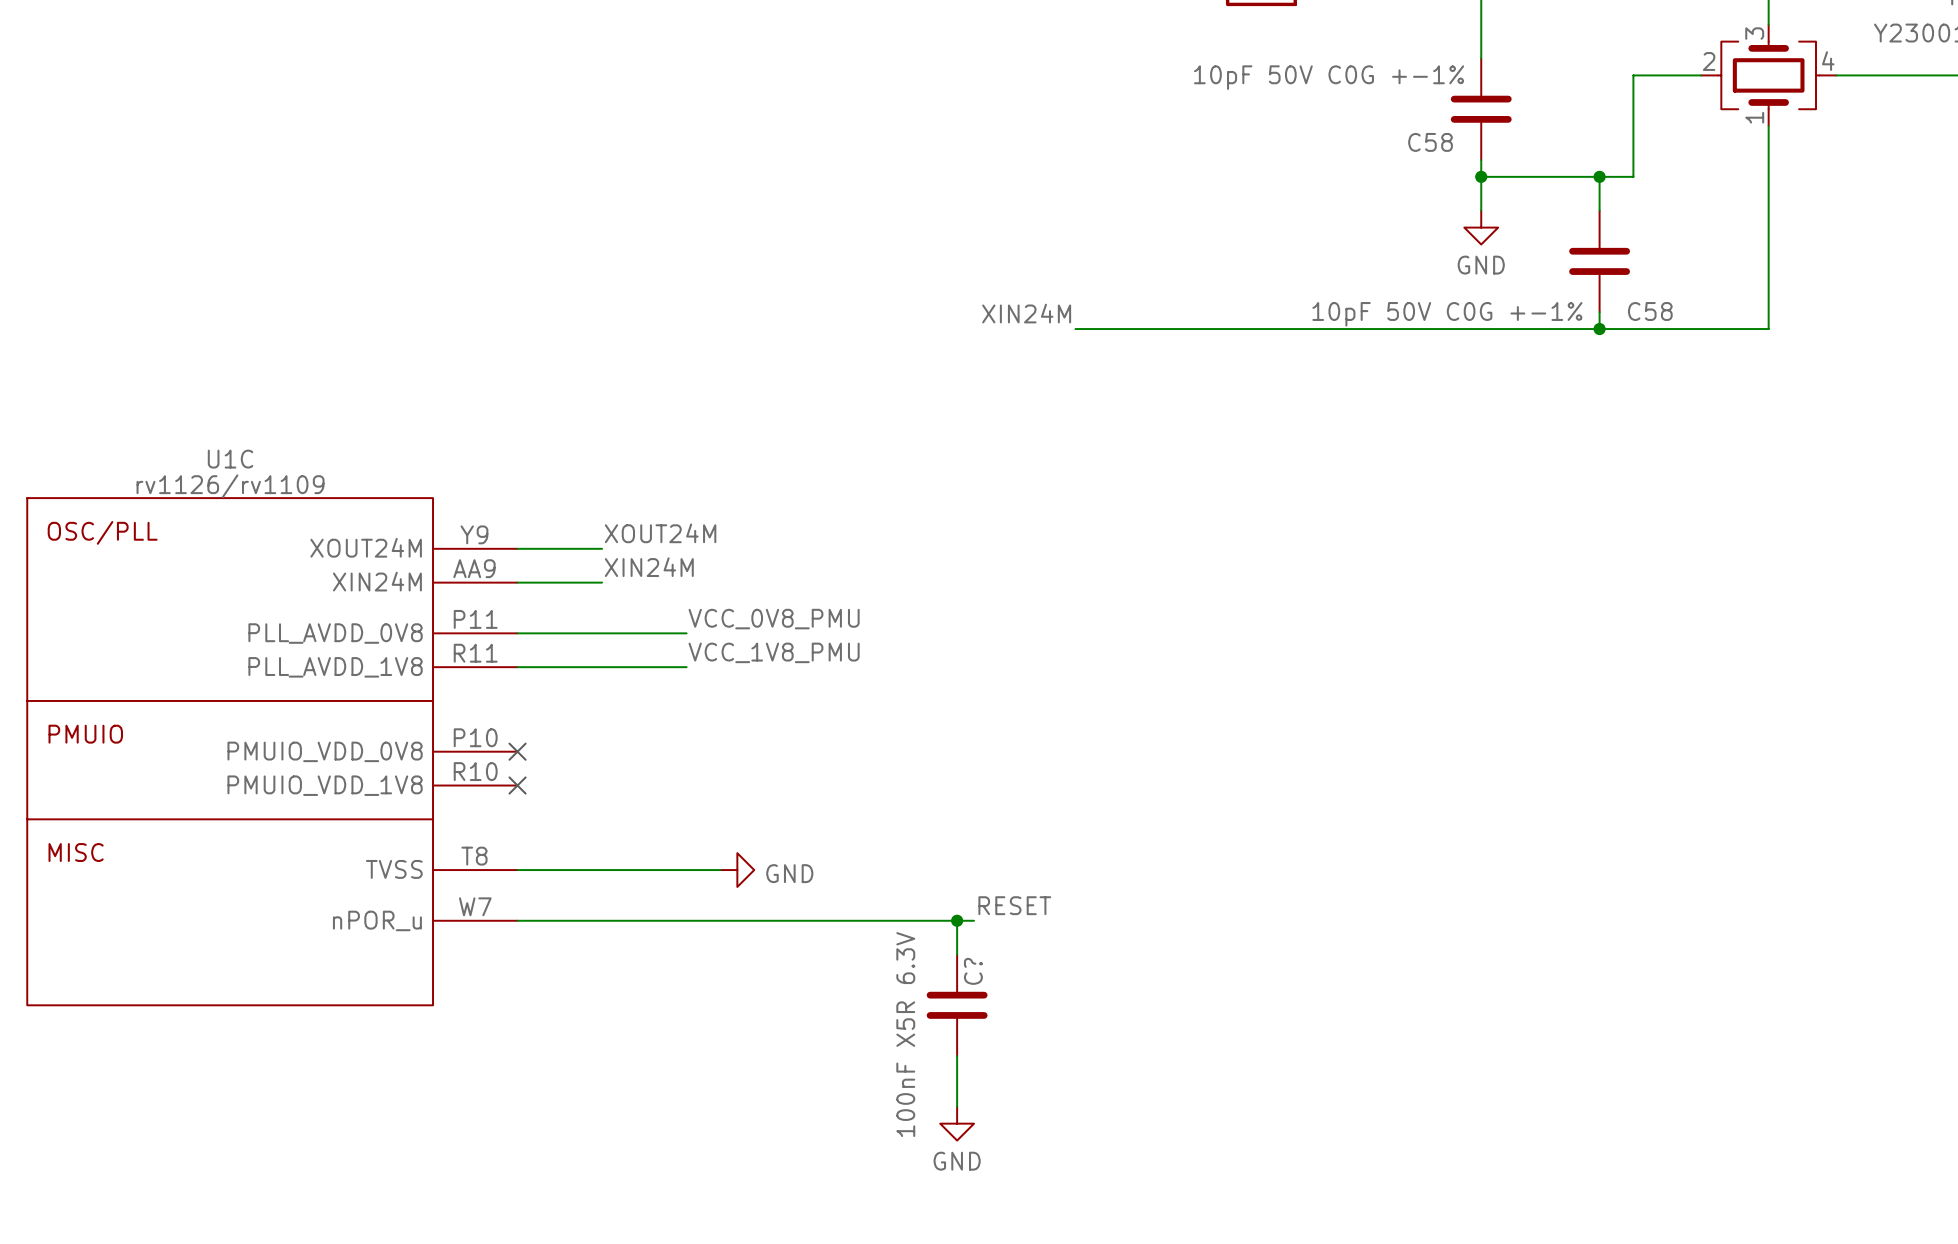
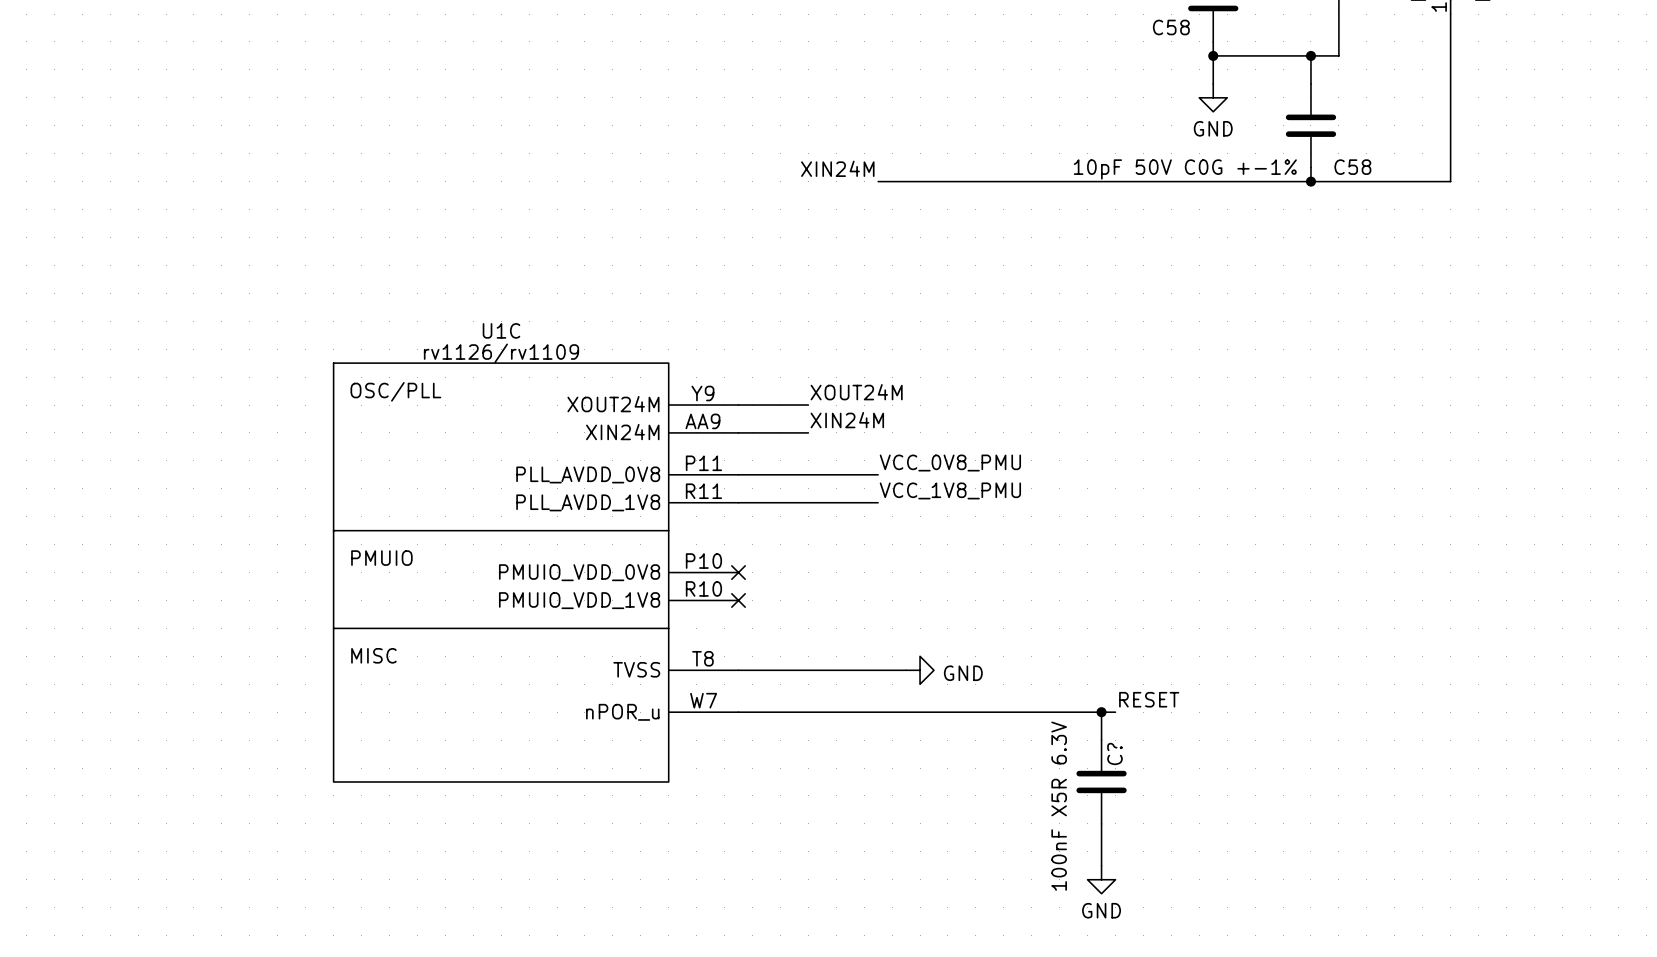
label: XOUT24M (660, 533) -> none
label: XIN24M (649, 567) -> none
wire: (517, 582) (602, 582) -> none
label: none -> XOUT24M (856, 392)
wire: none -> (738, 405) (808, 405)
label: none -> XIN24M (847, 420)
label: VCC_0V8_PMU (774, 619) -> none
wire: (517, 633) (686, 633) -> none
wire: none -> (738, 432) (808, 432)
label: VCC_1V8_PMU (774, 652) -> none
wire: (517, 667) (686, 667) -> none
label: none -> VCC_0V8_PMU (950, 463)
wire: none -> (738, 474) (878, 474)
label: none -> VCC_1V8_PMU (950, 490)
wire: none -> (738, 502) (878, 502)
U1C position: (272, 751) -> (536, 572)
no-connect mark: (517, 751) -> none
no-connect mark: (517, 785) -> none
no-connect mark: none -> (738, 572)
no-connect mark: none -> (738, 600)
power symbol: GND (737, 870) -> none
label: RESET (1014, 905) -> none
wire: (517, 920) (906, 920) -> none
wire: (957, 920) (957, 954) -> none
junction: (957, 920) -> none
wire: none -> (794, 670) (906, 670)
power symbol: none -> GND (920, 670)
label: none -> RESET (1149, 699)
wire: none -> (738, 712) (1115, 712)
wire: none -> (1101, 712) (1101, 740)
junction: none -> (1101, 712)
C?: 100nF X5R 6.3V (957, 1005) -> none
wire: (957, 1056) (957, 1106) -> none
C?: none -> 100nF X5R 6.3V (1101, 781)
wire: none -> (1101, 823) (1101, 865)
power symbol: GND (957, 1123) -> none
power symbol: none -> GND (1101, 879)

